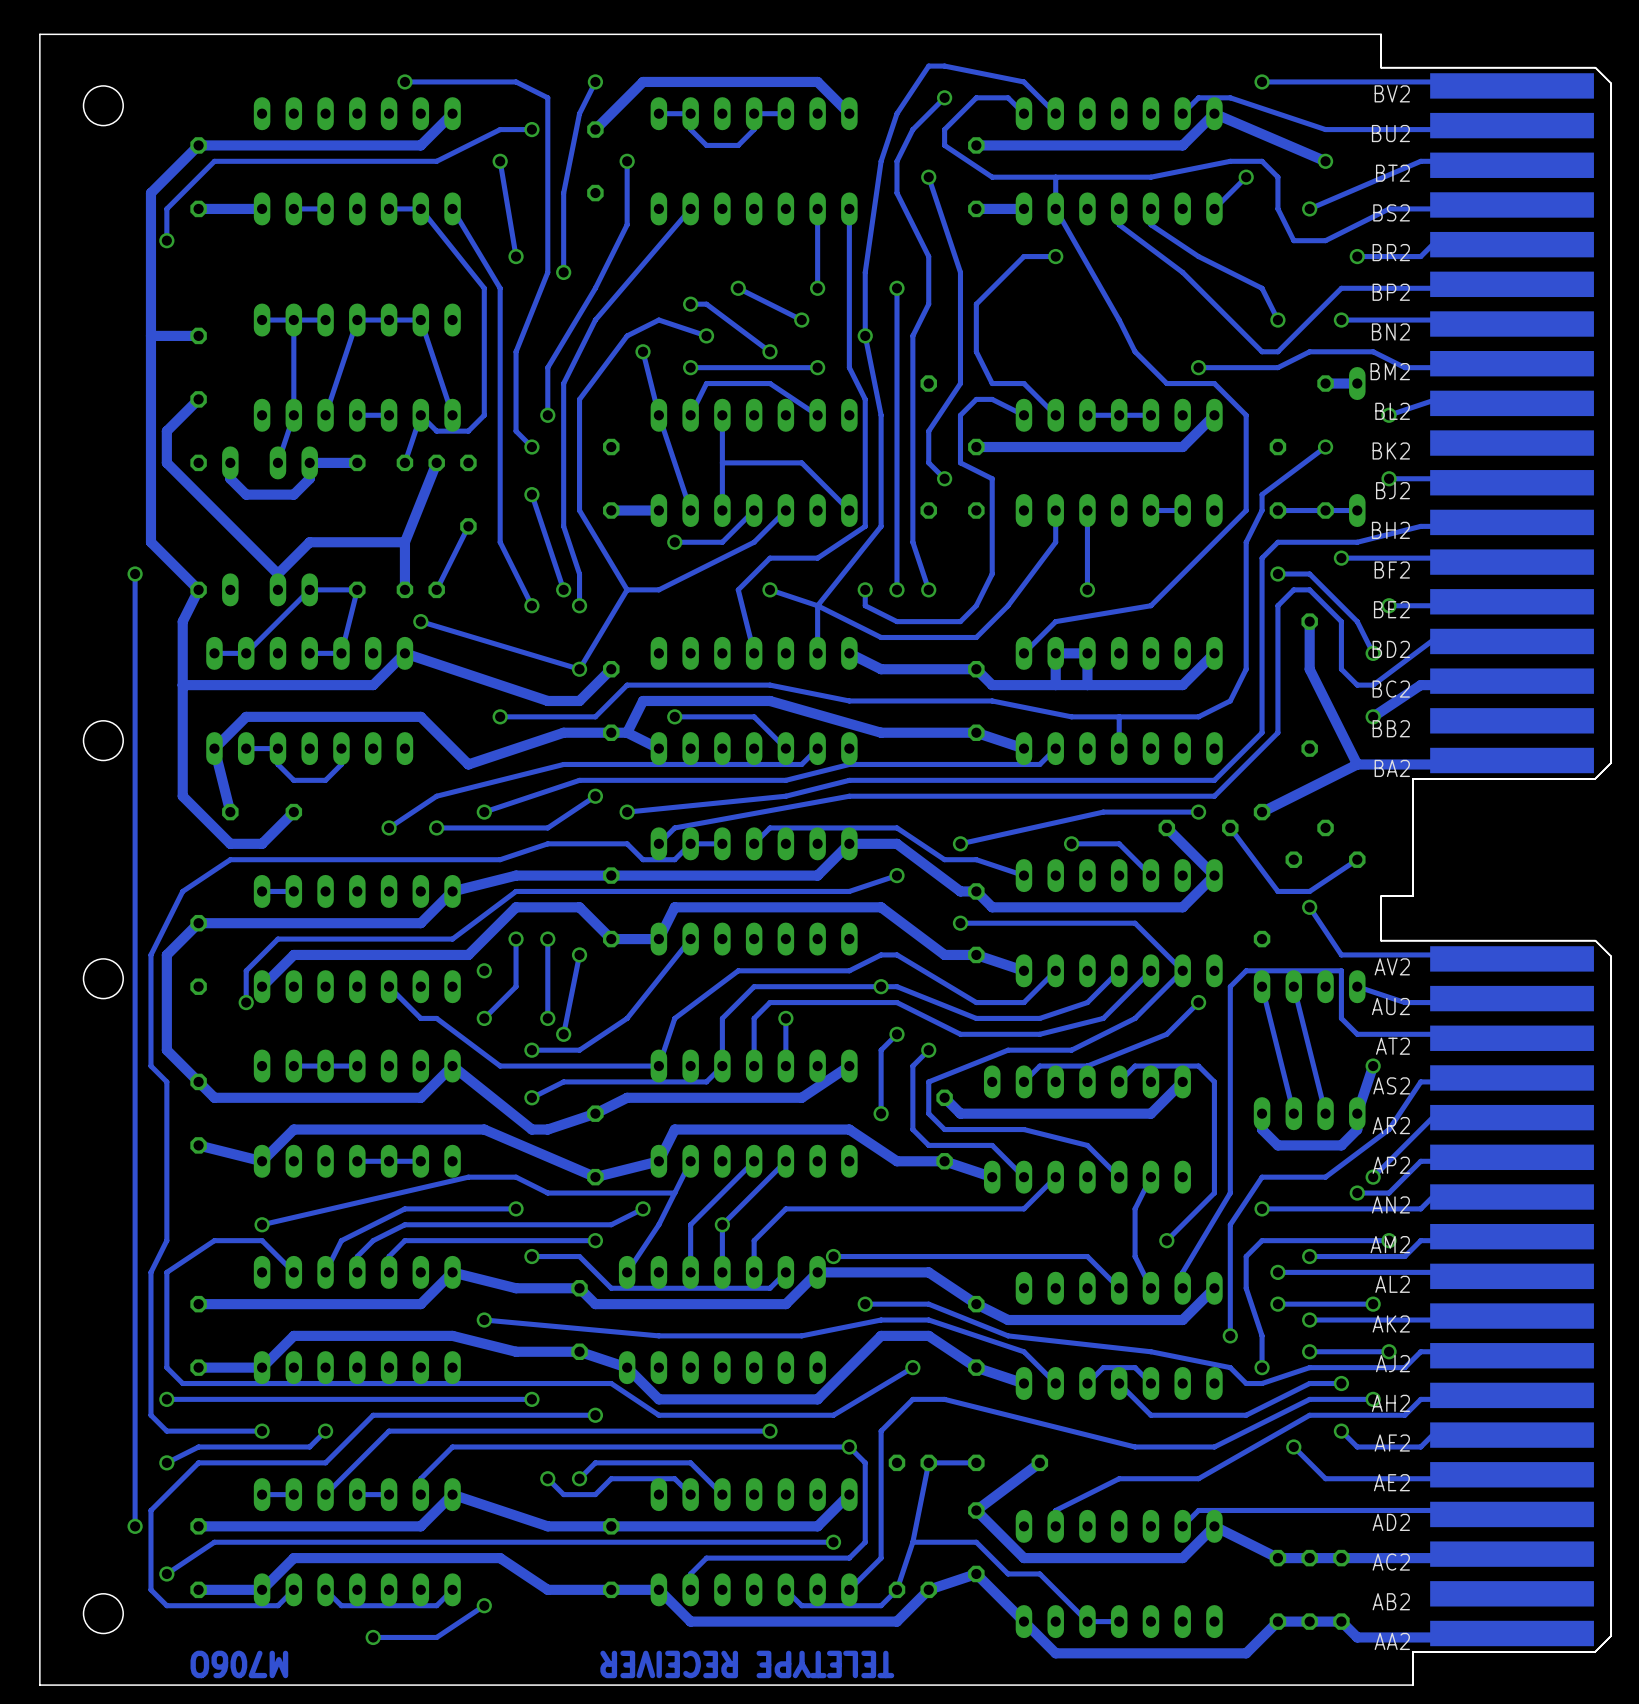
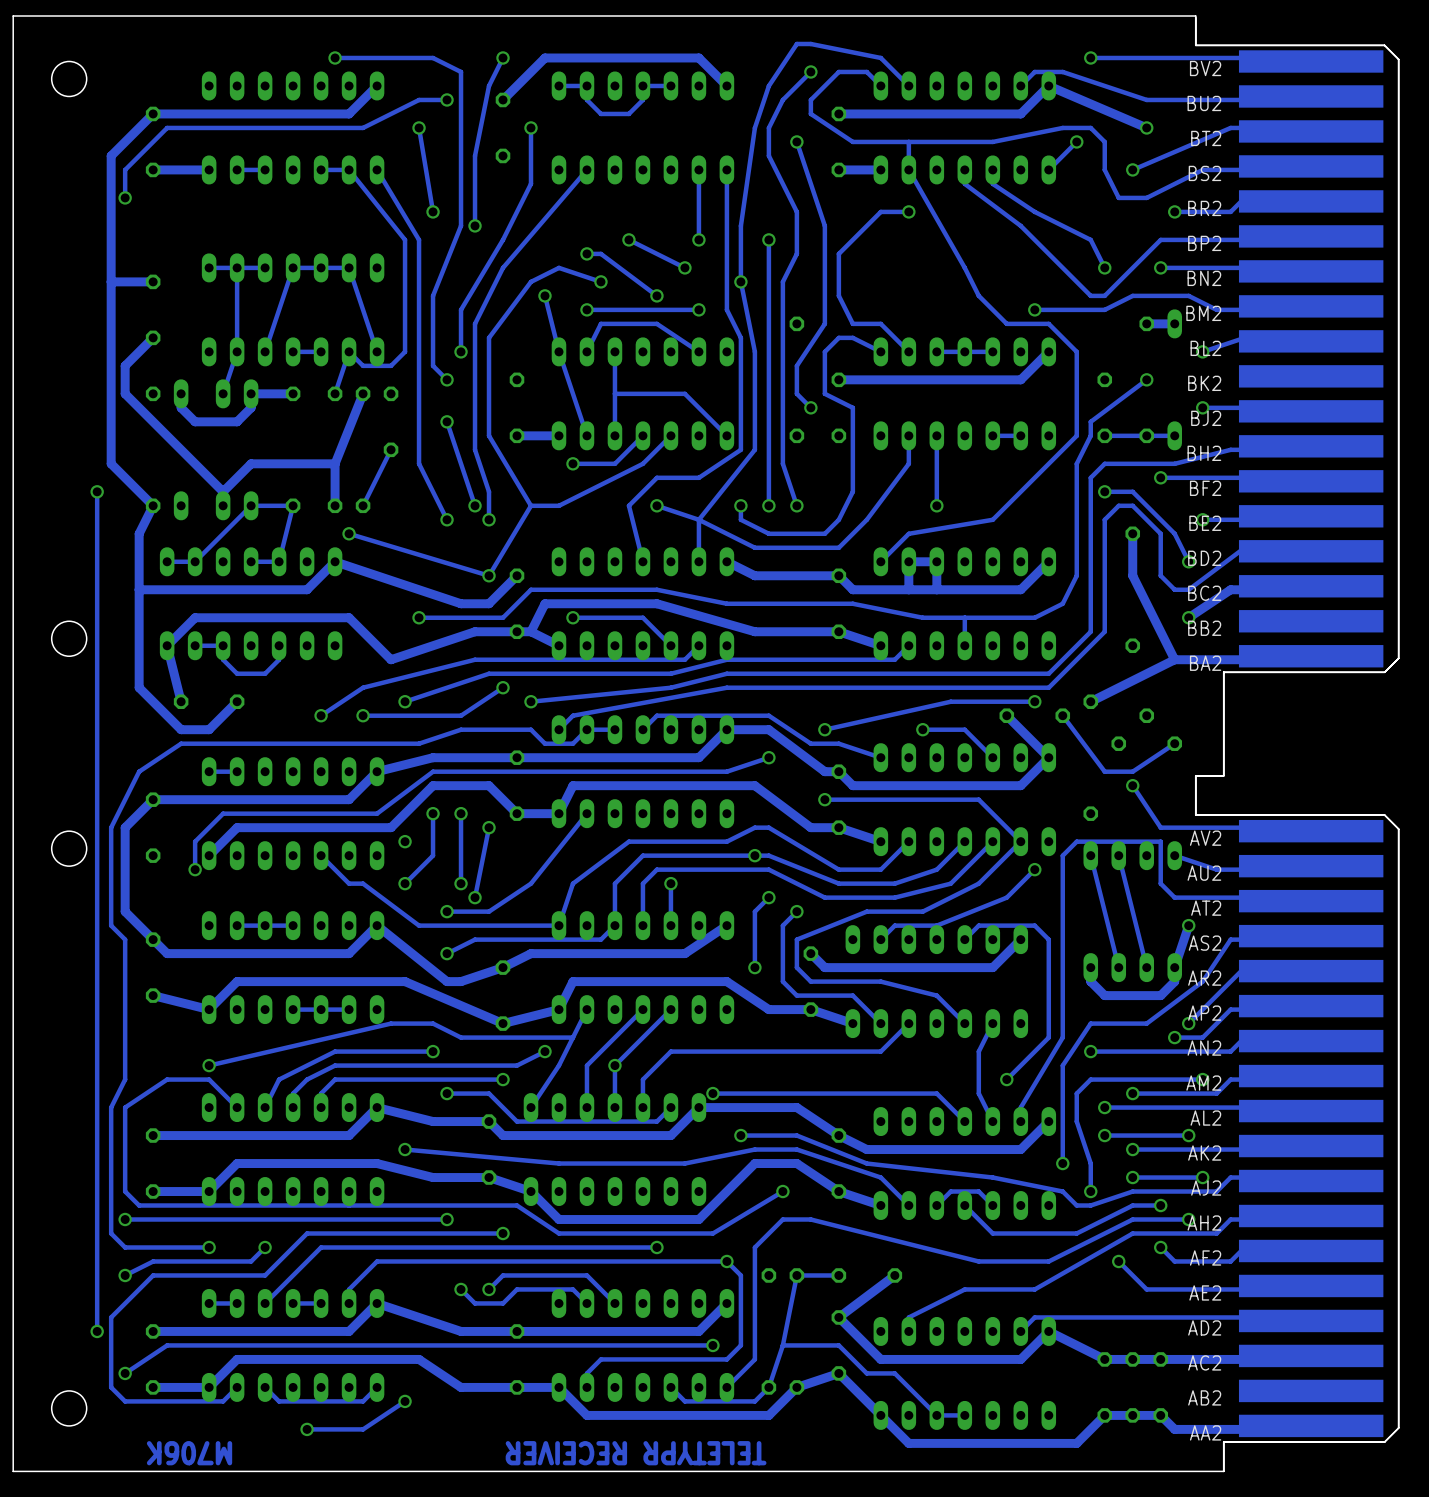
text: M706O (239, 1664) -> M706K (189, 1453)
text: TELETYPE RECEIVER (747, 1664) -> TELETYPR RECEIVER (636, 1453)

